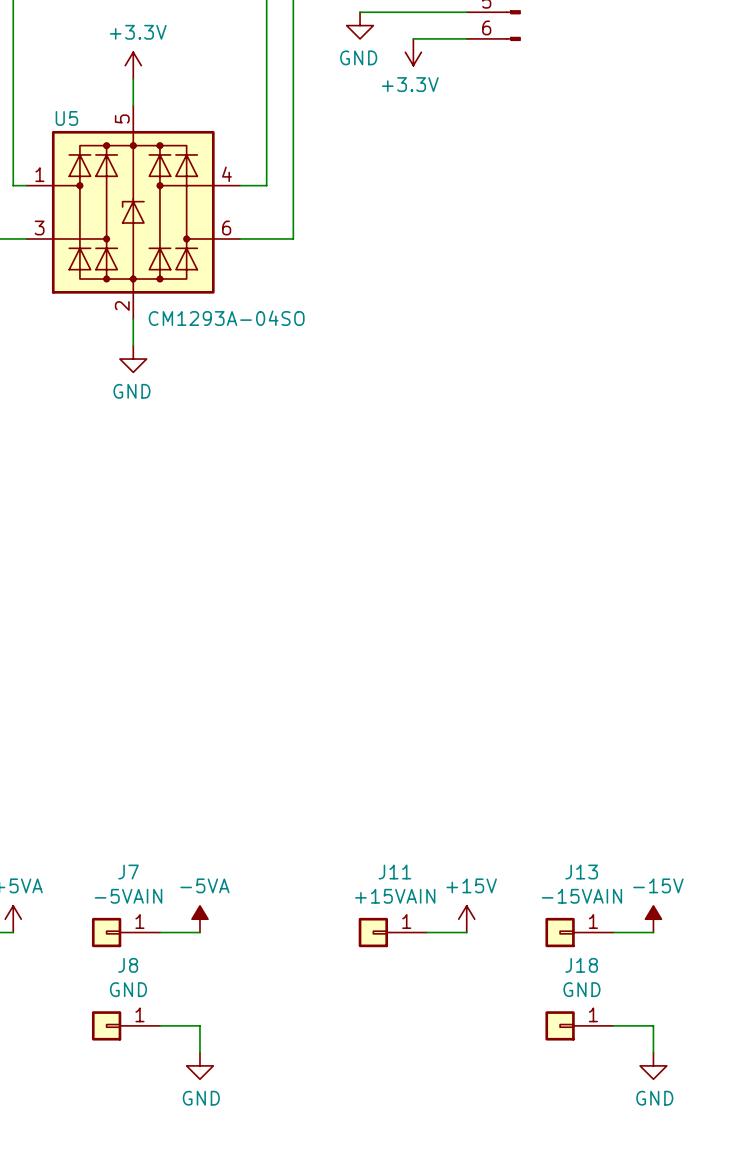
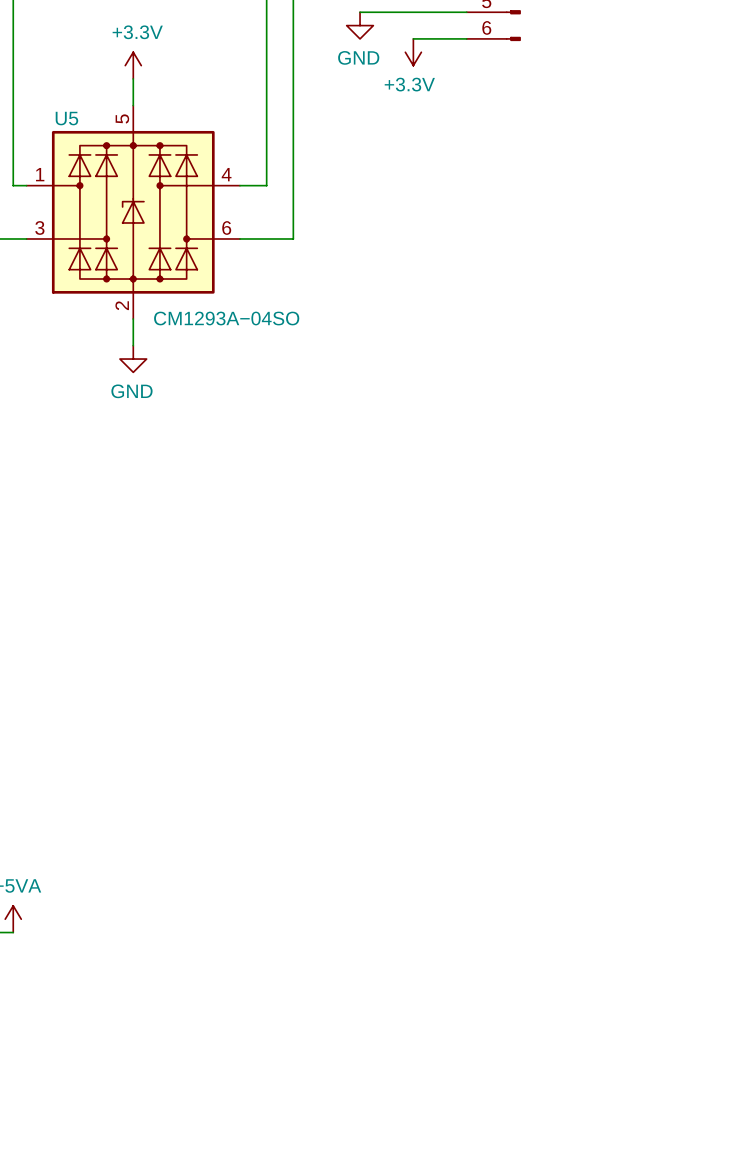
power symbol: -5VA (199, 919) -> none
power symbol: +15V (466, 919) -> none
power symbol: -15V (653, 919) -> none
J7: -5VAIN (125, 932) -> none
wire: (159, 932) (199, 932) -> none
J11: +15VAIN (392, 932) -> none
wire: (426, 932) (466, 932) -> none
J13: -15VAIN (579, 932) -> none
wire: (613, 932) (653, 932) -> none
J8: GND (125, 1025) -> none
wire: (159, 1025) (199, 1025) (199, 1052) -> none
J18: GND (579, 1025) -> none
wire: (613, 1025) (653, 1025) (653, 1052) -> none
power symbol: GND (199, 1065) -> none
power symbol: GND (653, 1065) -> none

